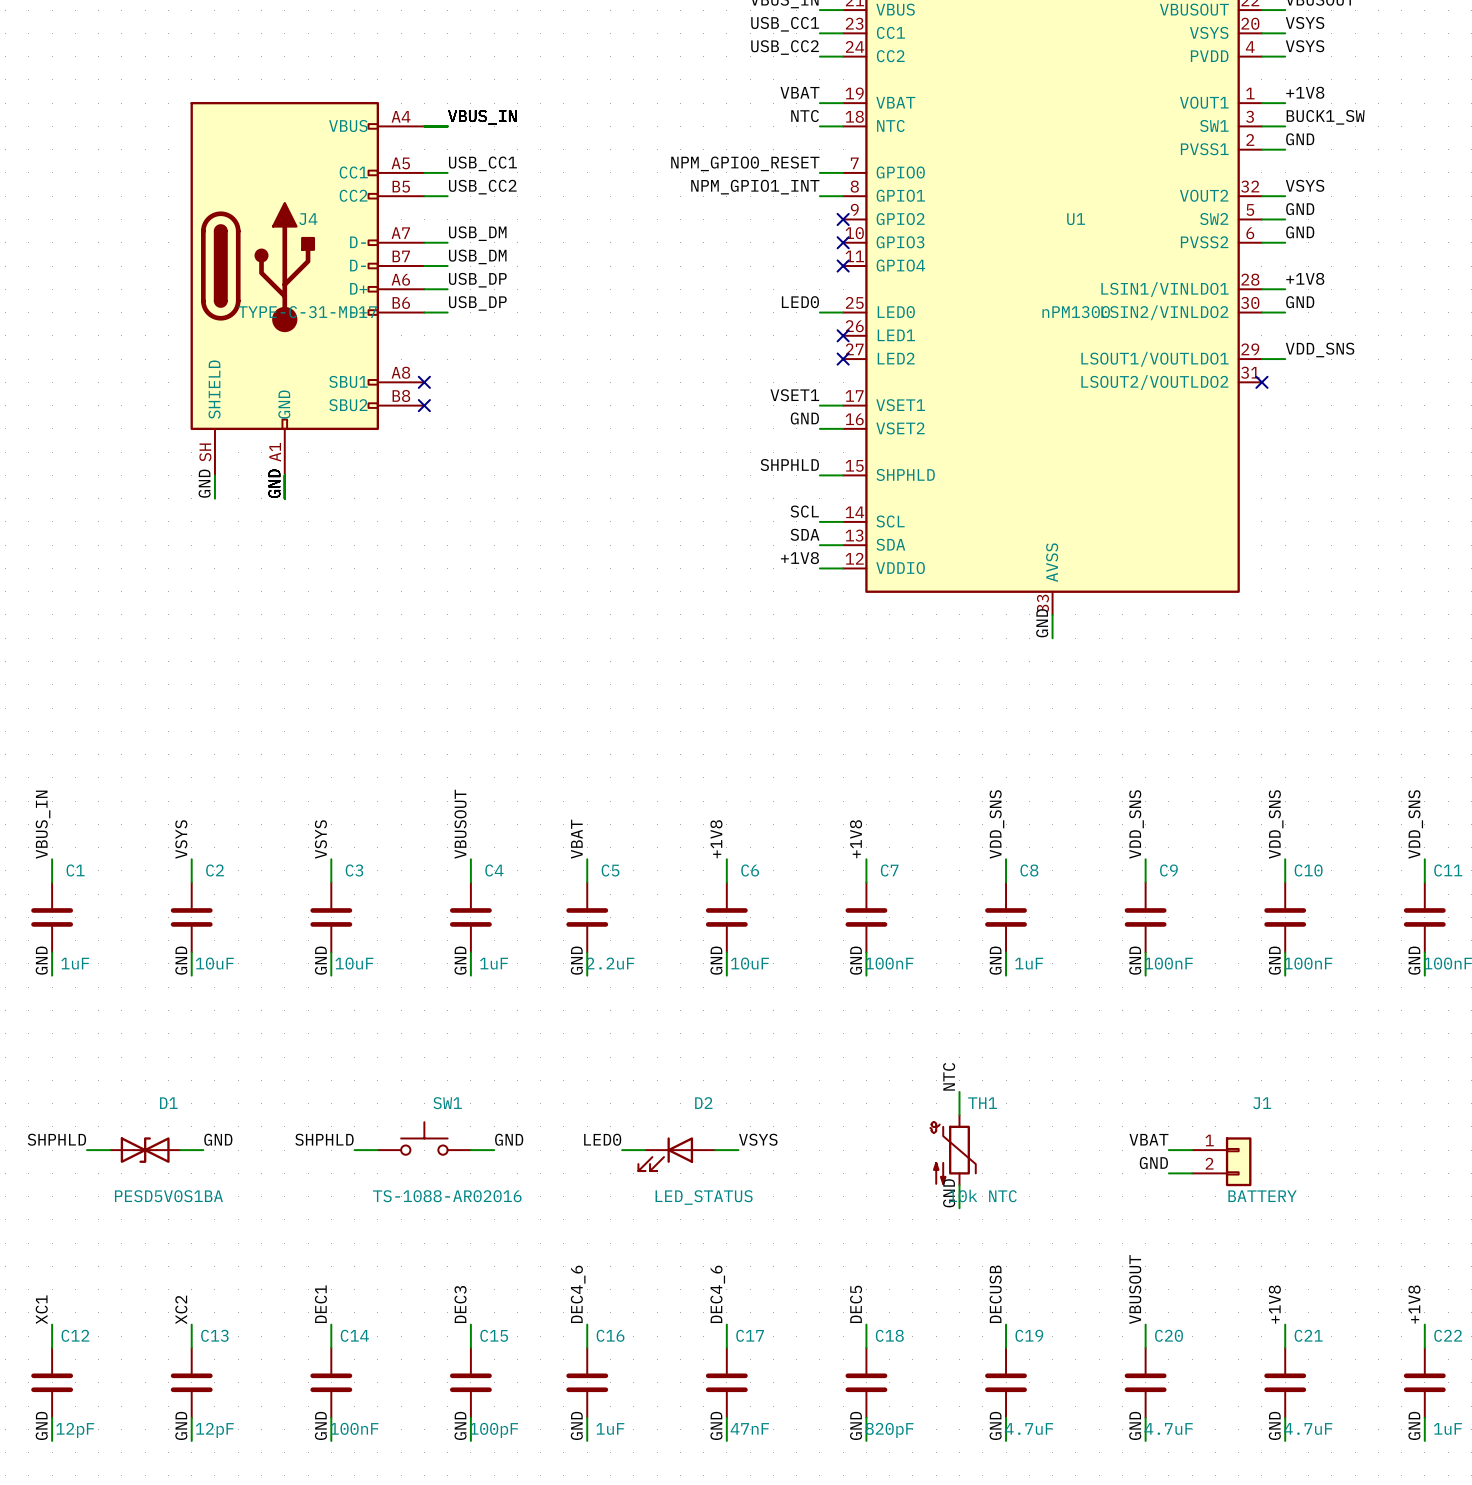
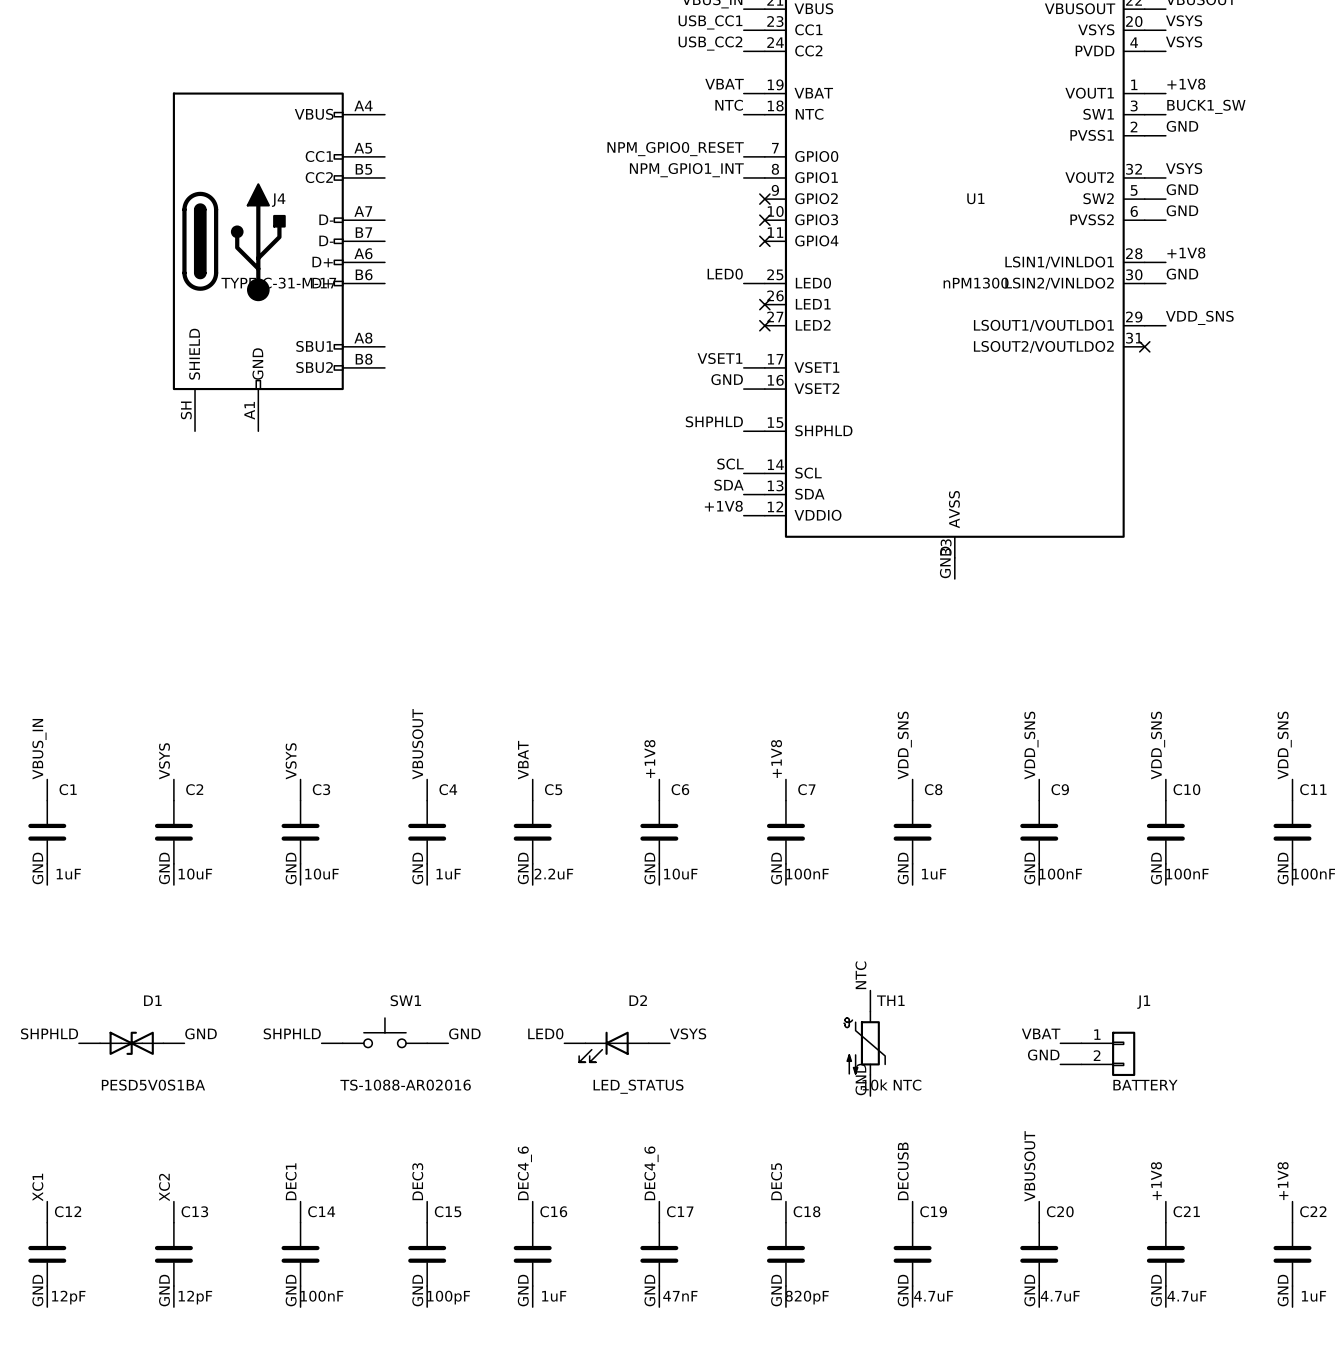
label: VBUS_IN (482, 117) -> none
wire: (424, 126) (447, 126) -> none
label: USB_CC1 (482, 163) -> none
wire: (424, 172) (447, 172) -> none
label: USB_CC2 (482, 187) -> none
wire: (424, 196) (447, 196) -> none
label: USB_DM (477, 233) -> none
wire: (424, 242) (447, 242) -> none
label: USB_DM (477, 256) -> none
wire: (424, 266) (447, 266) -> none
label: USB_DP (477, 280) -> none
wire: (424, 289) (447, 289) -> none
label: USB_DP (477, 303) -> none
wire: (424, 312) (447, 312) -> none
no-connect mark: (424, 382) -> none
no-connect mark: (424, 405) -> none
wire: (214, 475) (214, 498) -> none
wire: (284, 475) (284, 498) -> none
label: GND (204, 483) -> none
label: GND (274, 483) -> none

